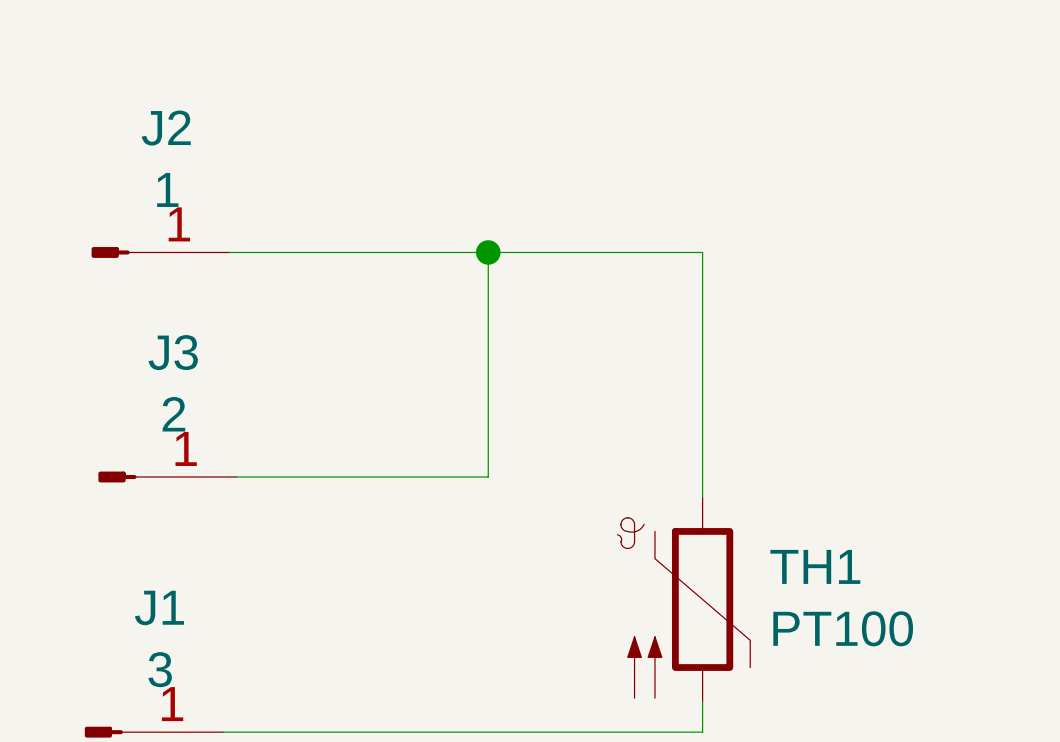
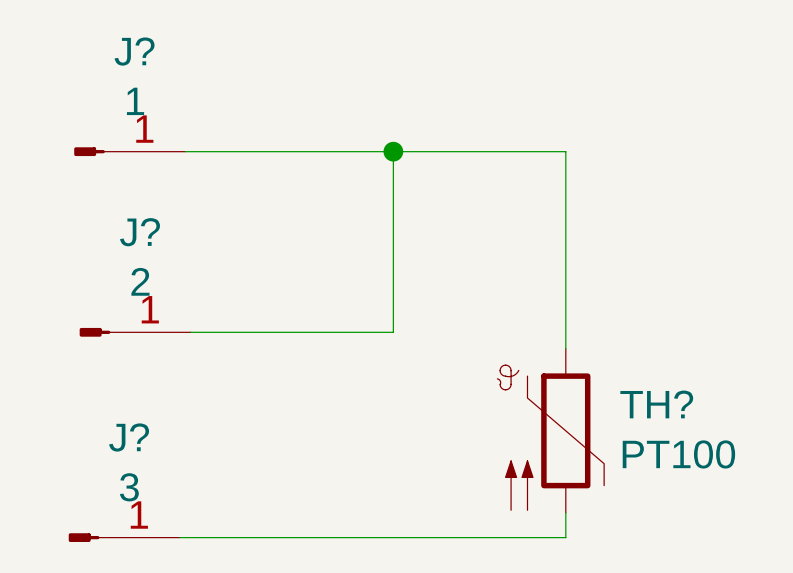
J2 name: J2 (166, 128) -> J? (134, 51)
J3 name: J3 (173, 352) -> J? (140, 232)
TH1 name: TH1 (815, 566) -> TH? (656, 404)
J1 name: J1 (159, 607) -> J? (129, 437)

